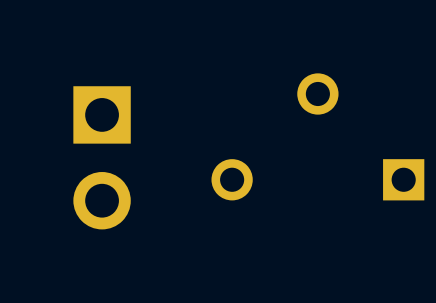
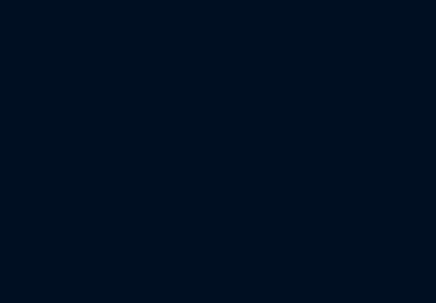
part: (317, 136) -> none
part: (102, 157) -> none

